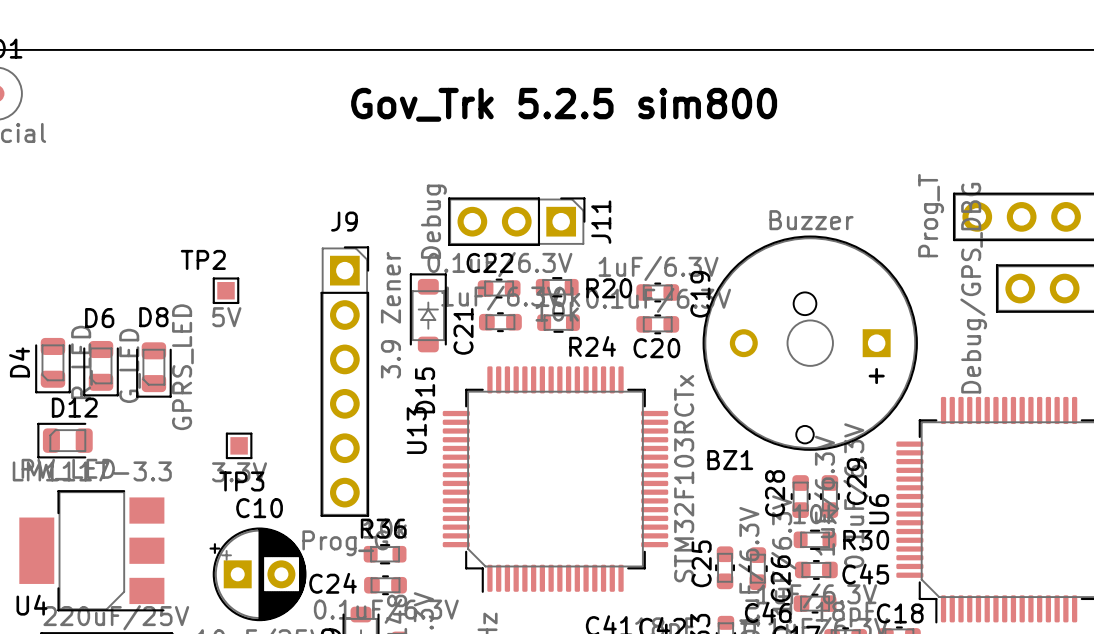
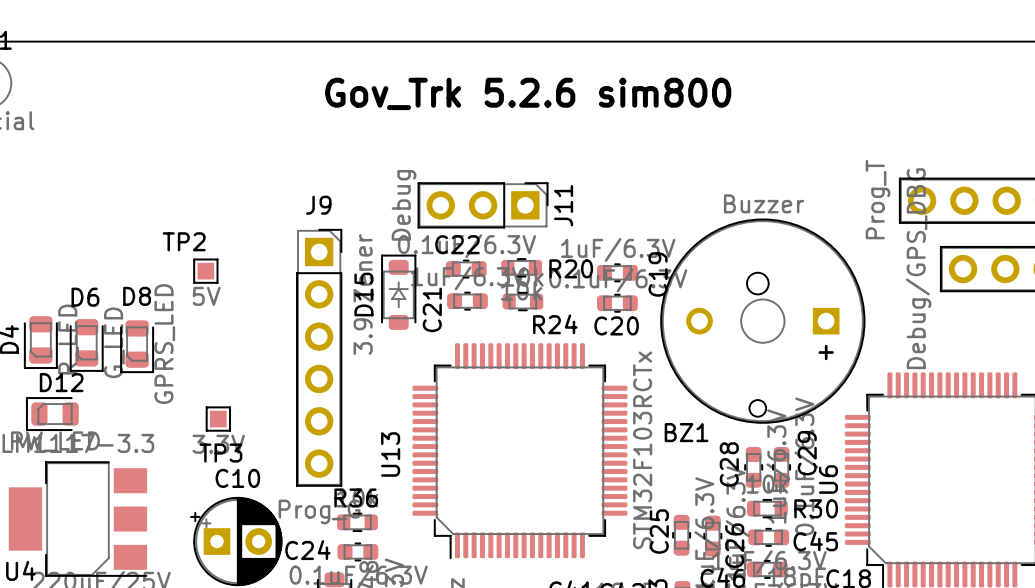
text: Gov_Trk 5.2.5 sim800 (564, 104) -> Gov_Trk 5.2.6 sim800 (528, 93)
D15 name position: D15 (425, 390) -> D15 (363, 294)
U13 name position: U13 (416, 430) -> U13 (390, 454)

